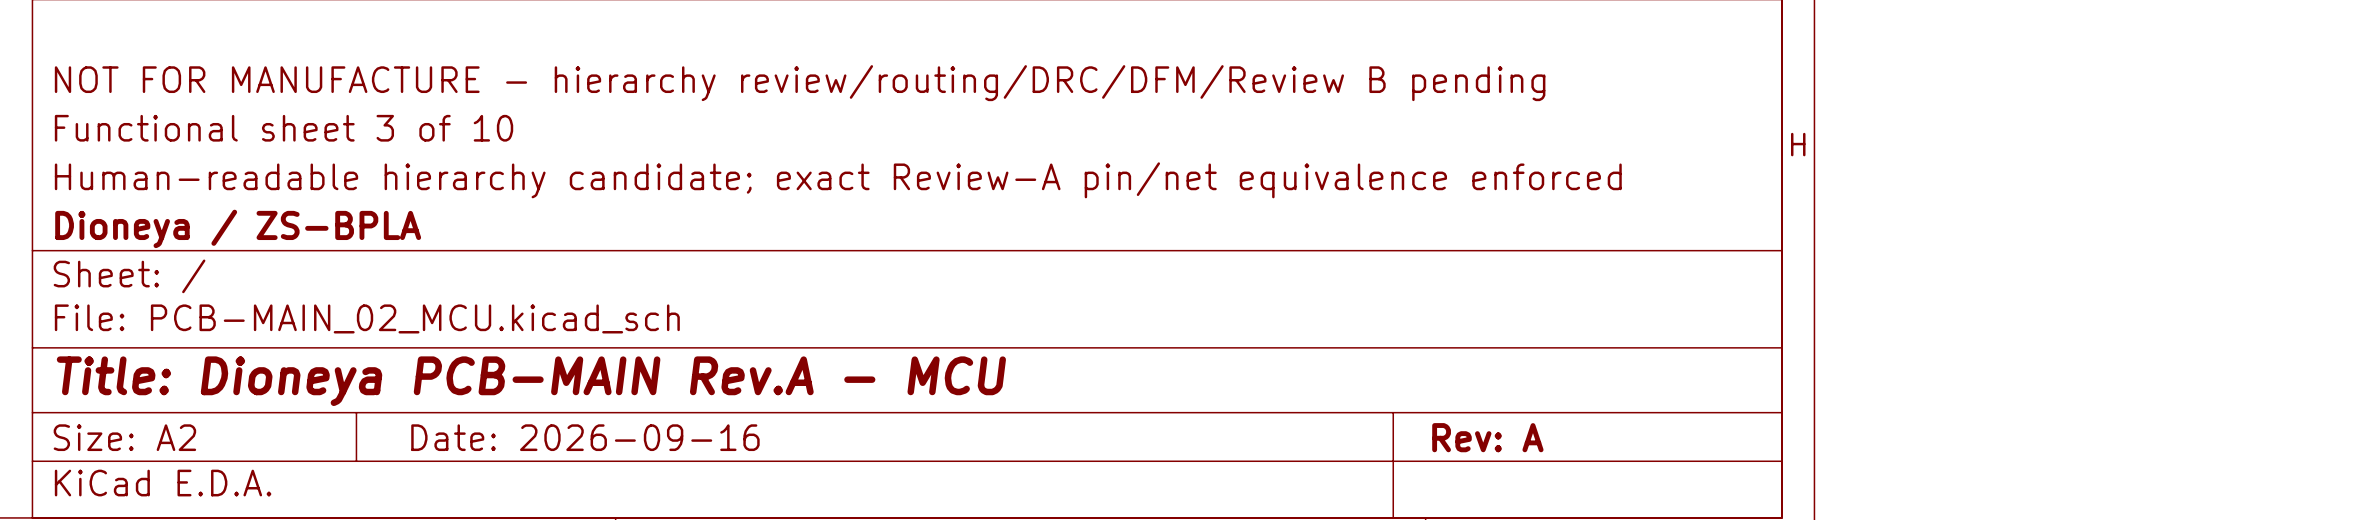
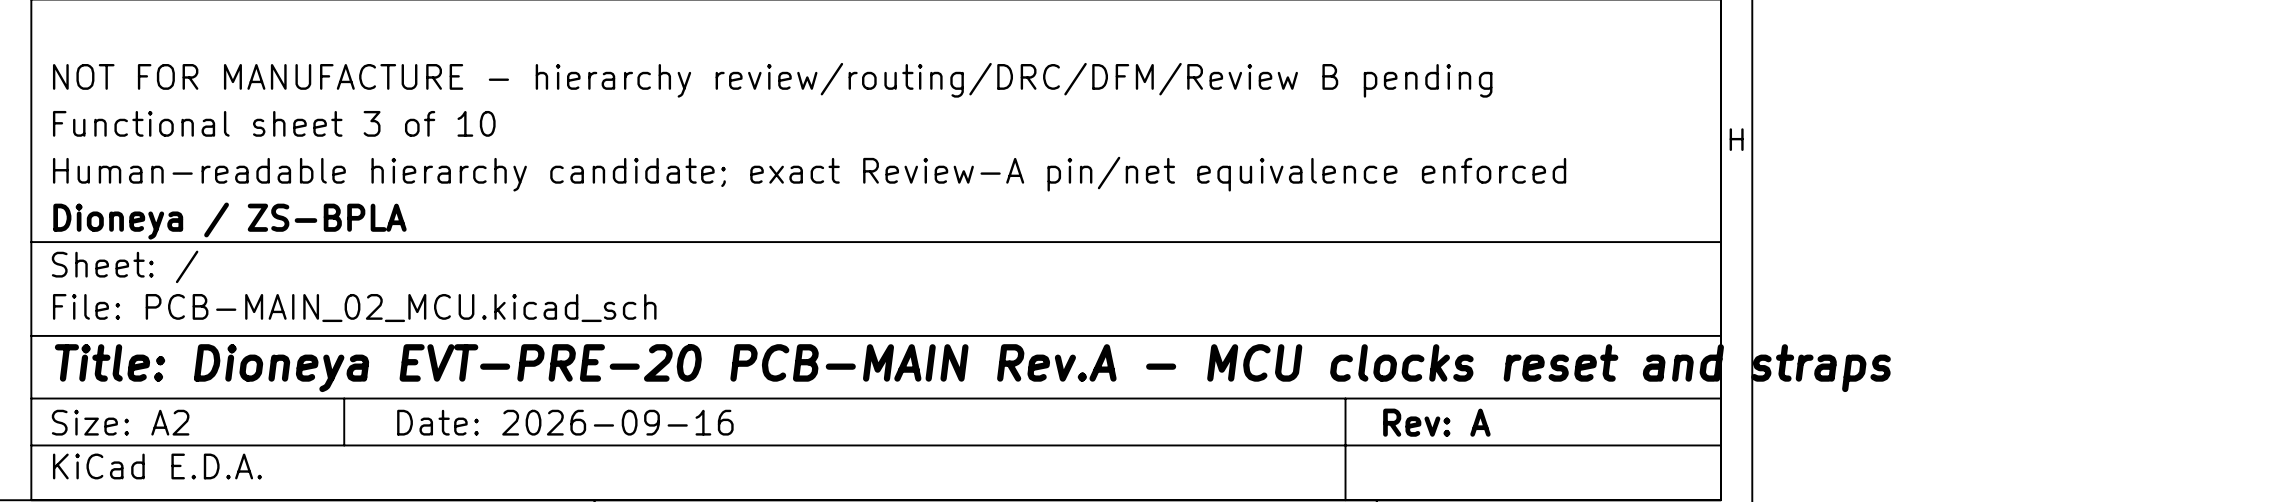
title block: Title: Dioneya PCB-MAIN Rev.A - MCU (531, 381) -> Title: Dioneya EVT-PRE-20 PCB-MAIN Rev.A - MCU clocks reset and straps (972, 368)

